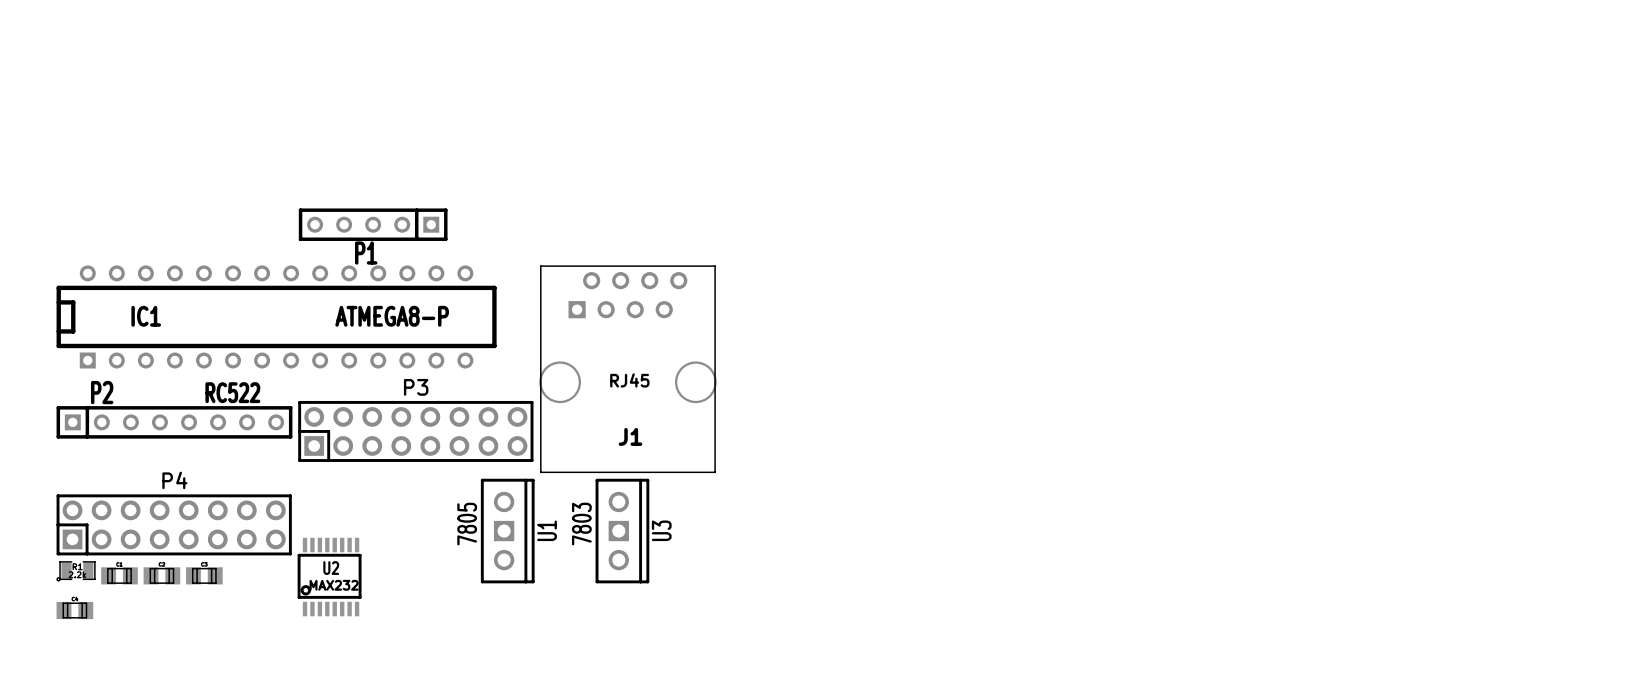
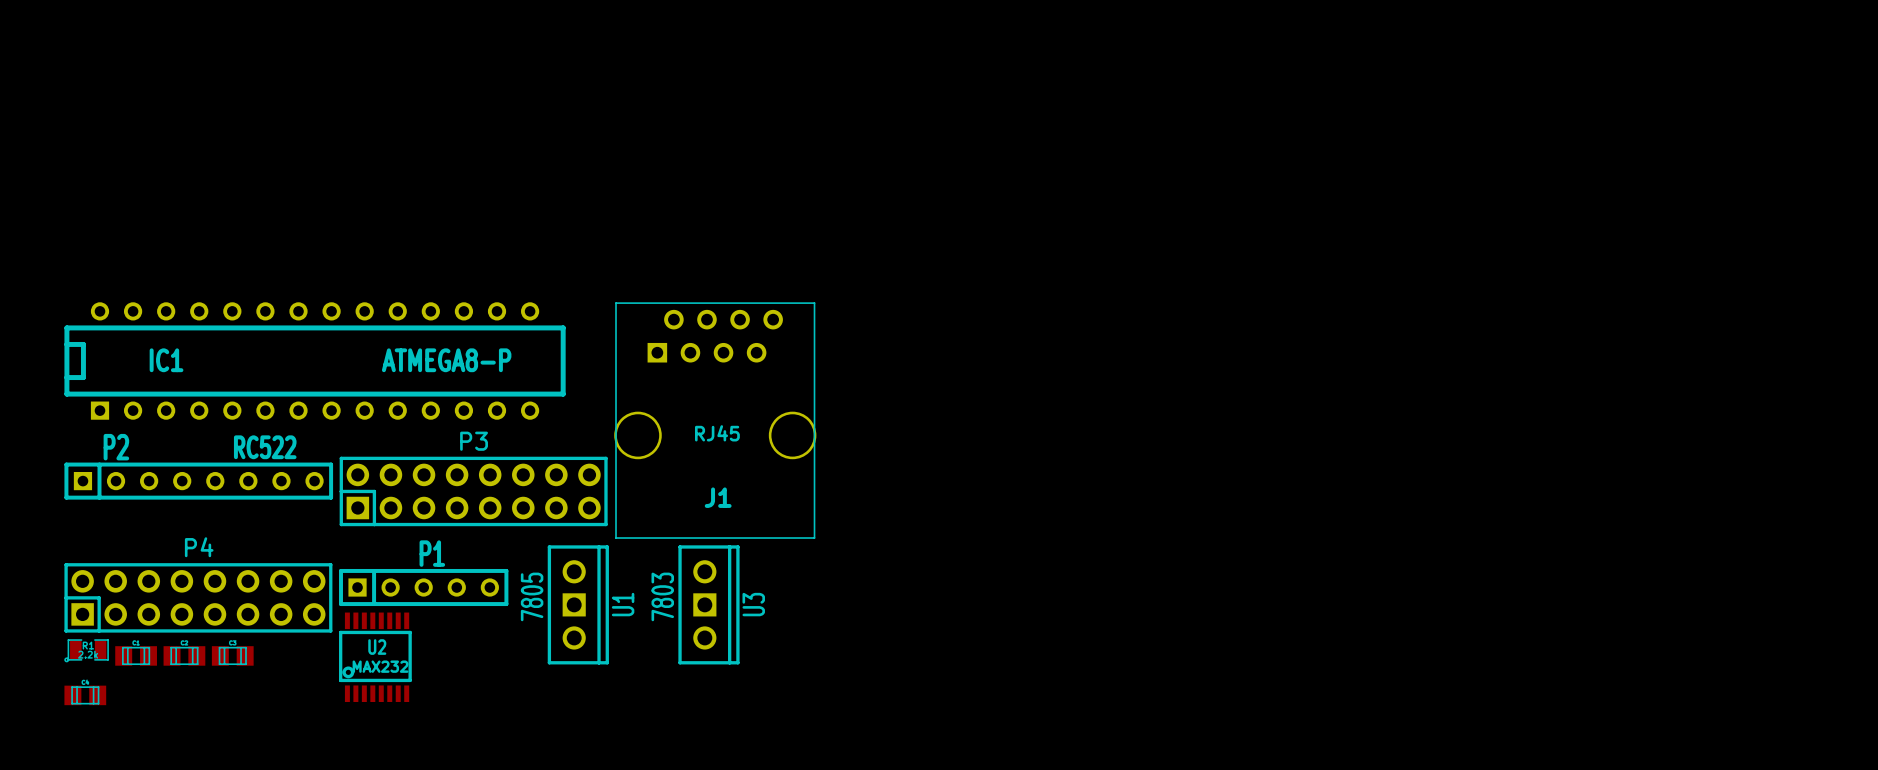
P1 rotation: 0° (373, 224) -> 180° (423, 587)
P1 position: (373, 224) -> (423, 587)

